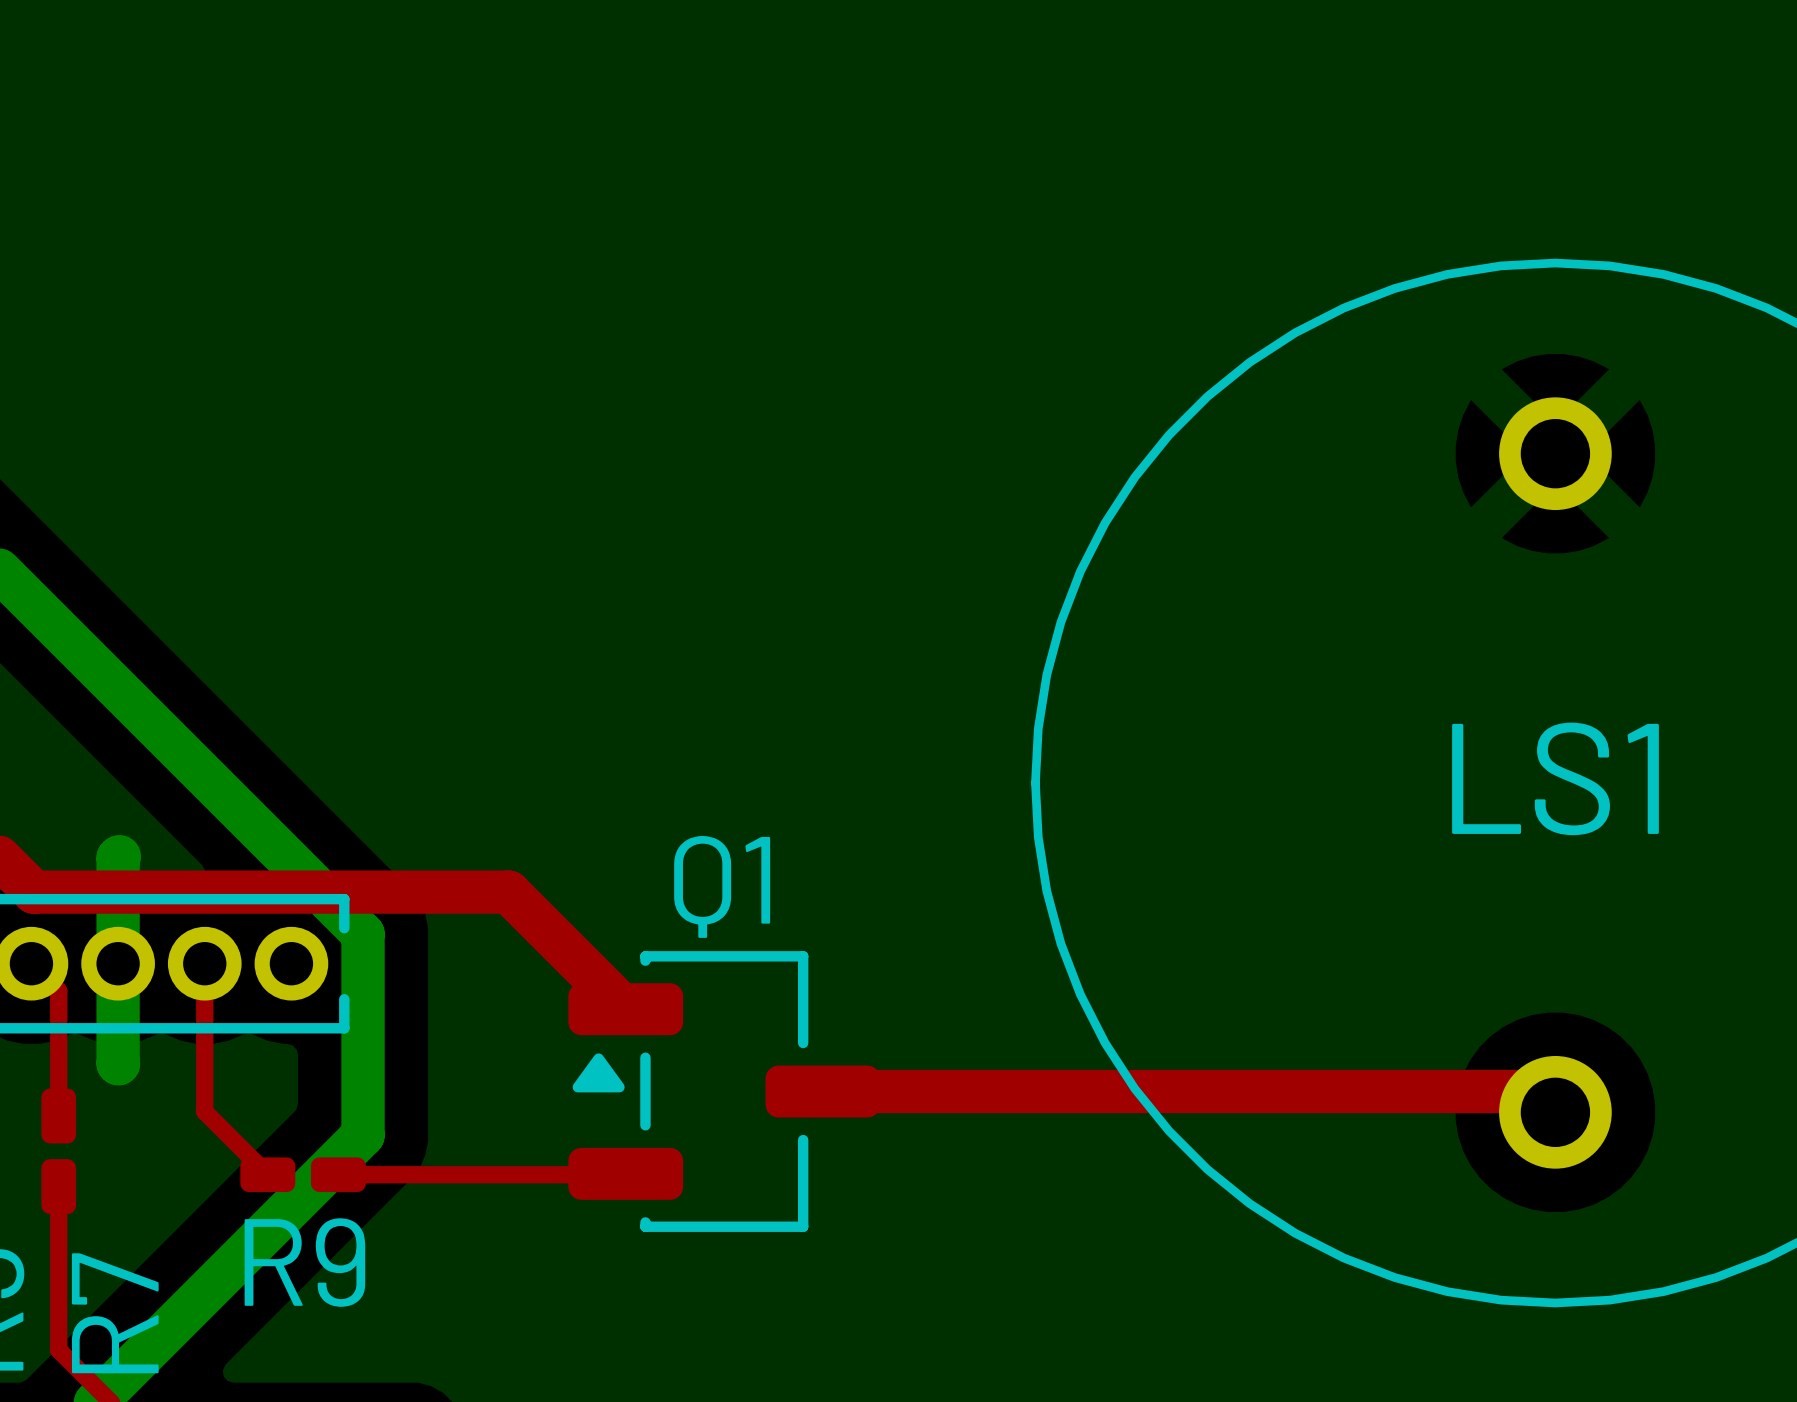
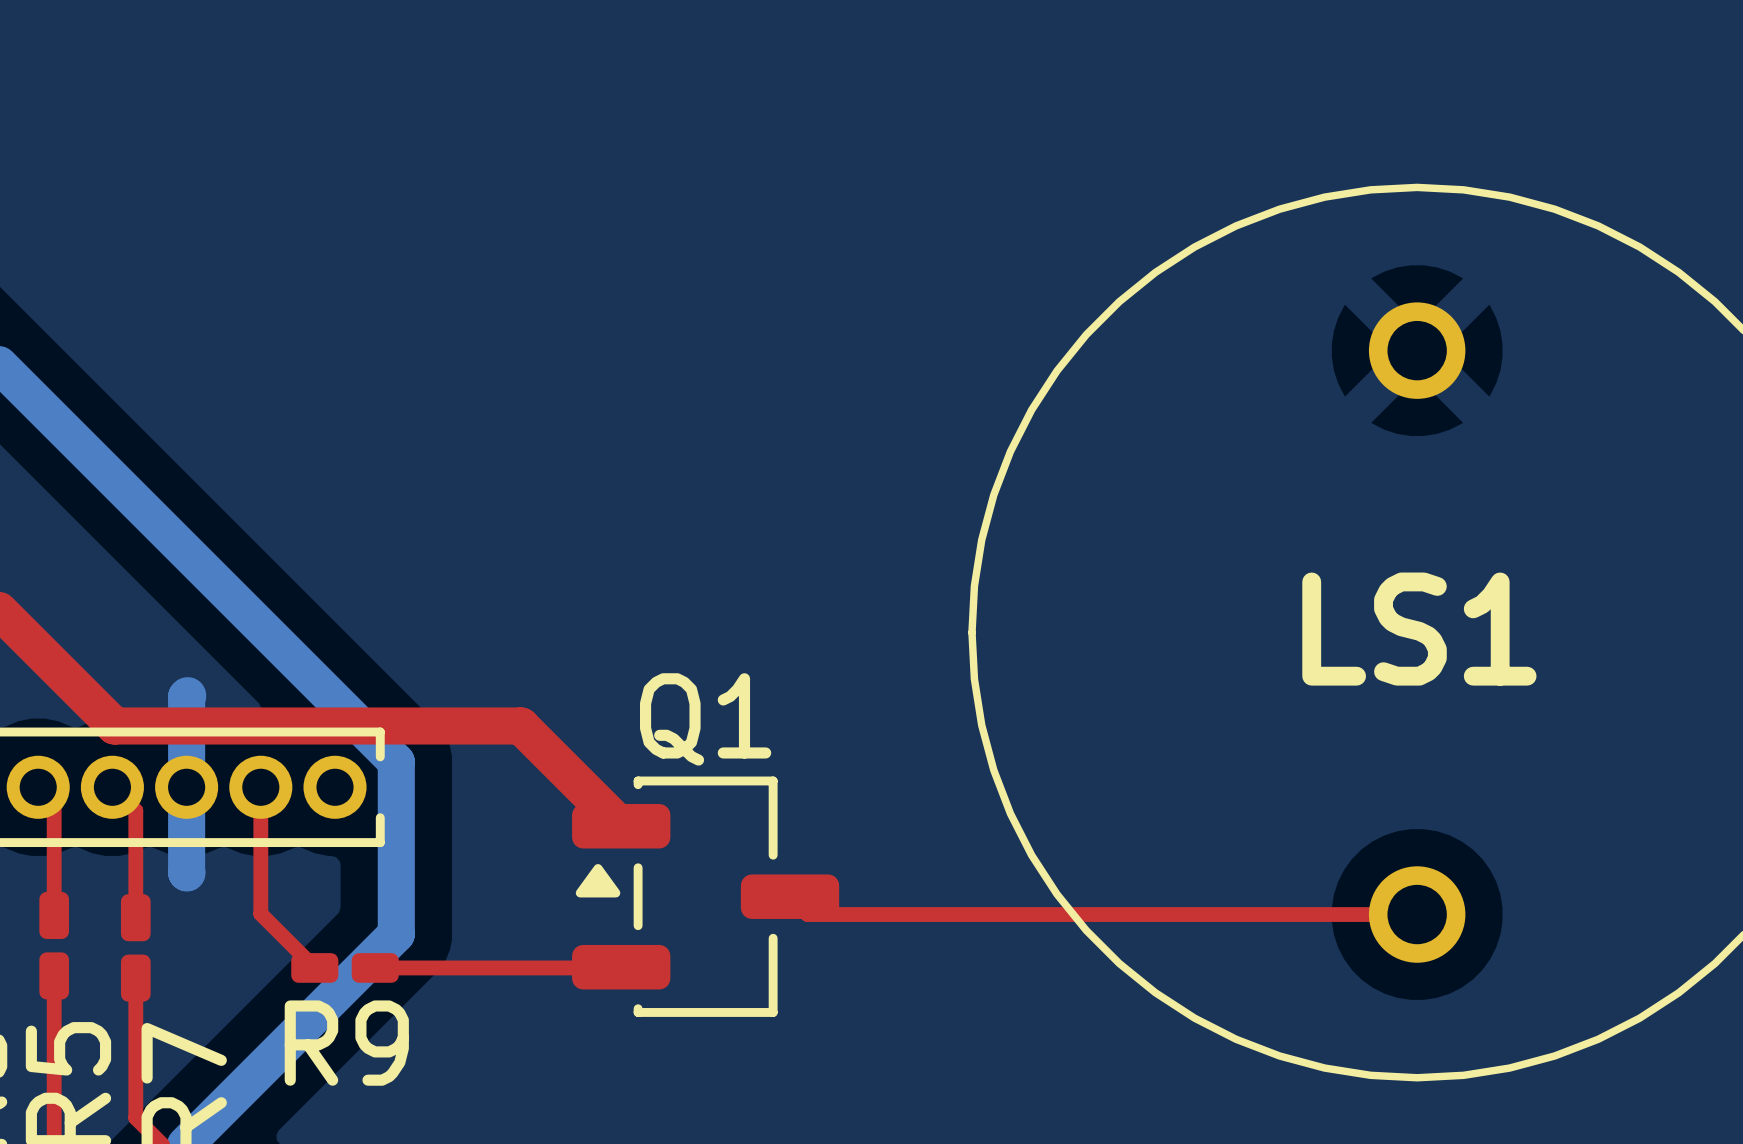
top track: (822, 1091) (1534, 1091) (1555, 1112) -> (790, 896) (807, 914) (1417, 914)

